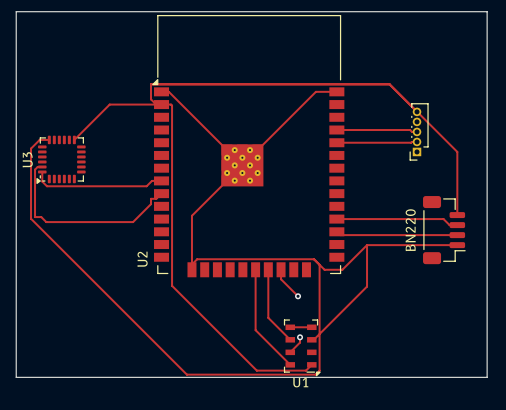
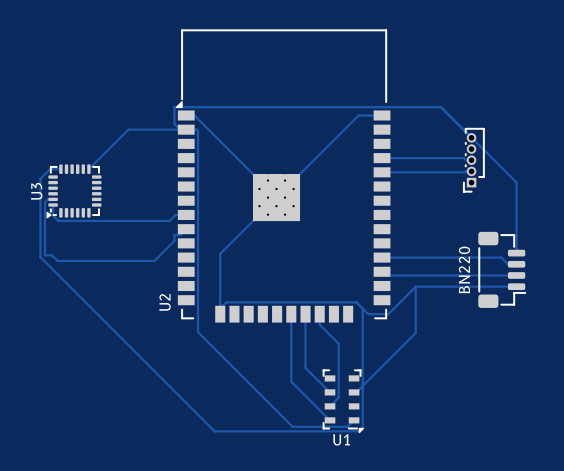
board edge: (16, 11) (487, 11) (487, 377) (16, 377) (16, 11) -> none
via: (298, 296) -> none
track: (290, 327) (311, 327) -> none
track: (300, 337) (298, 344) -> (338, 343) (338, 397)
via: (300, 337) -> none

